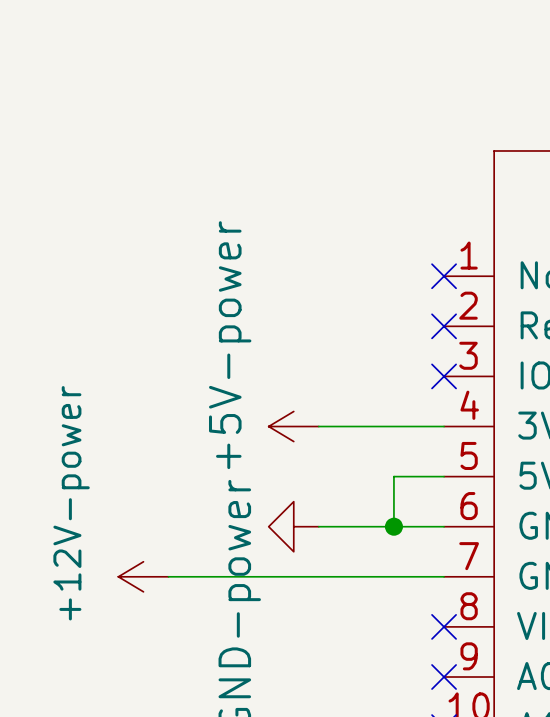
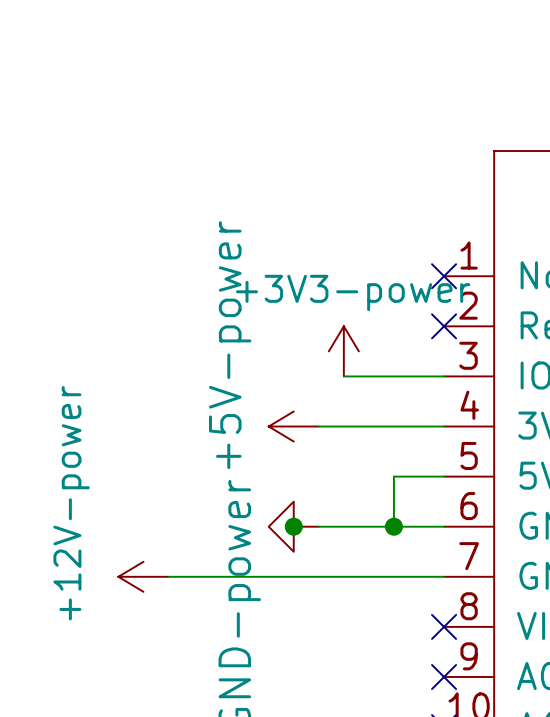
power symbol: none -> +3V3-power (343, 351)
wire: none -> (343, 376) (444, 376)
no-connect mark: (444, 376) -> none
junction: none -> (293, 526)

